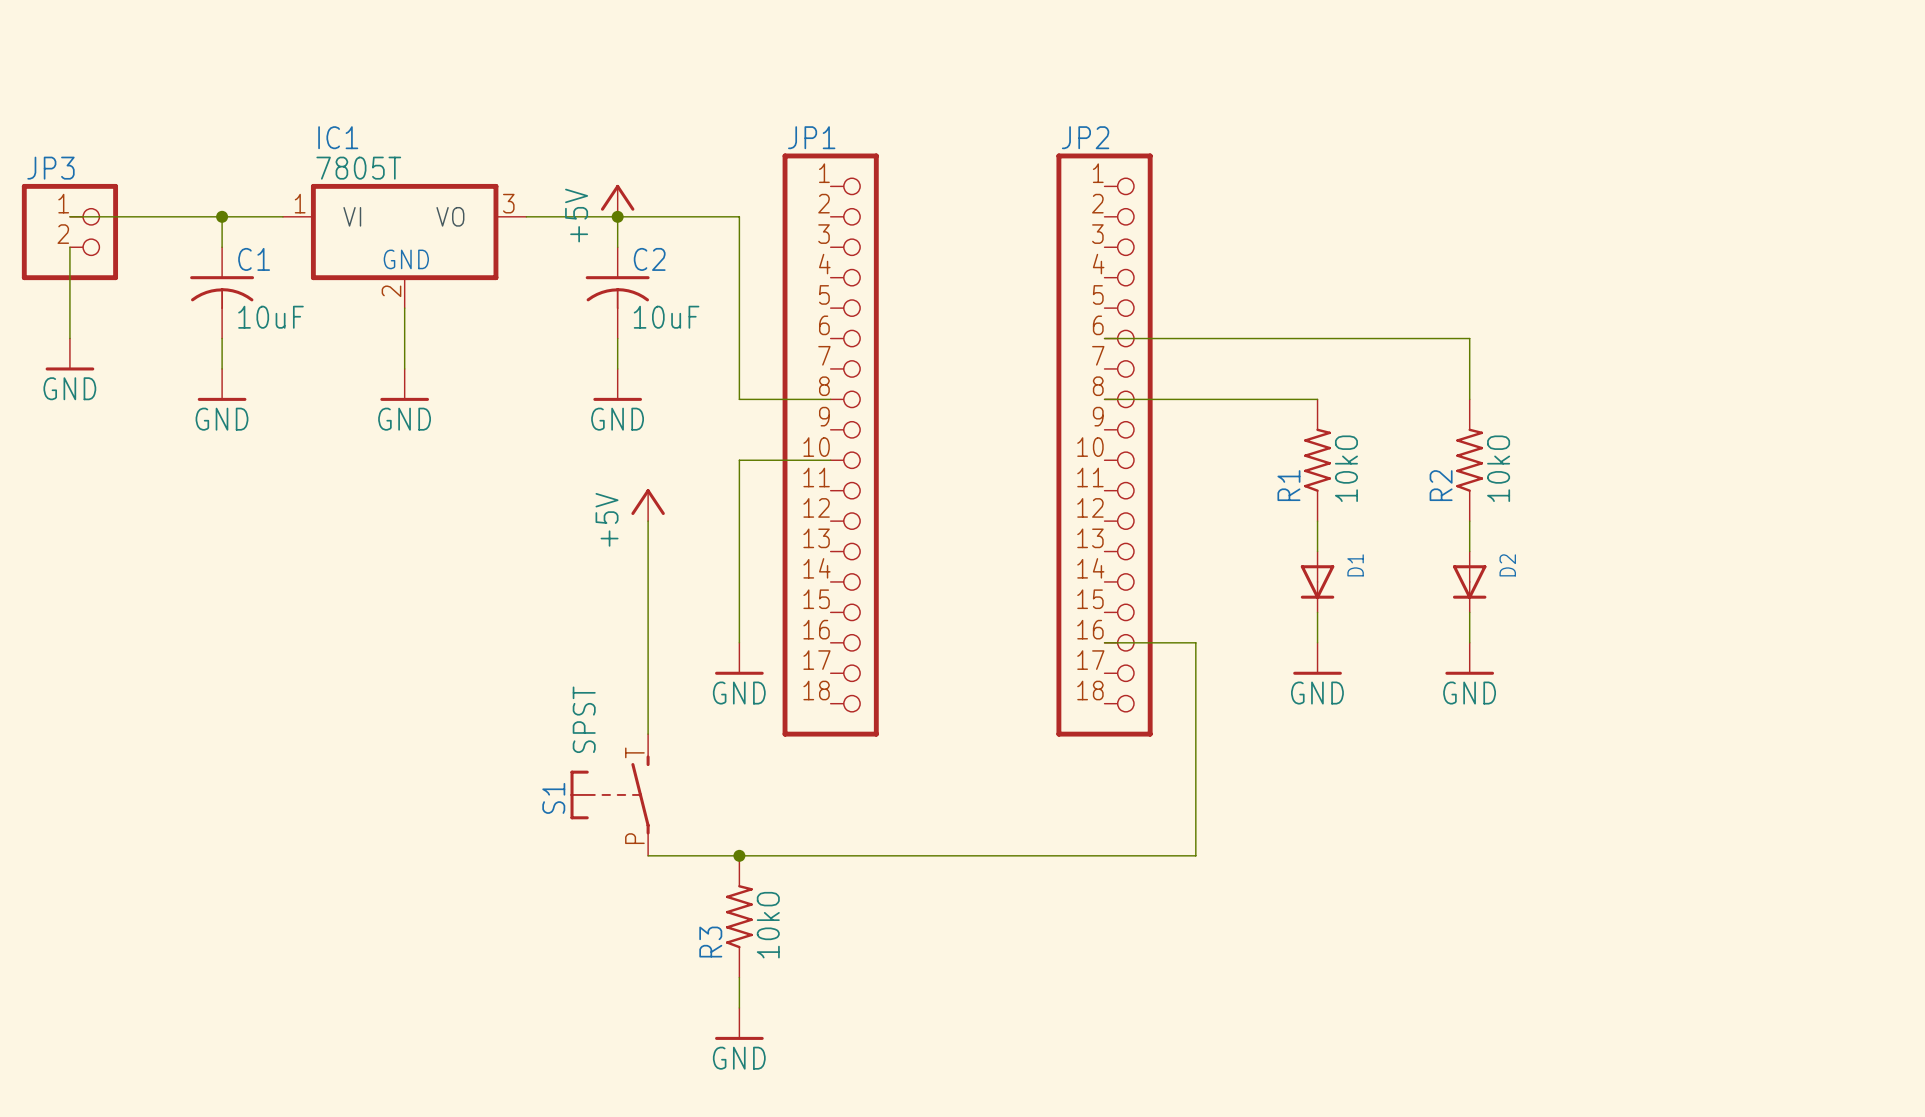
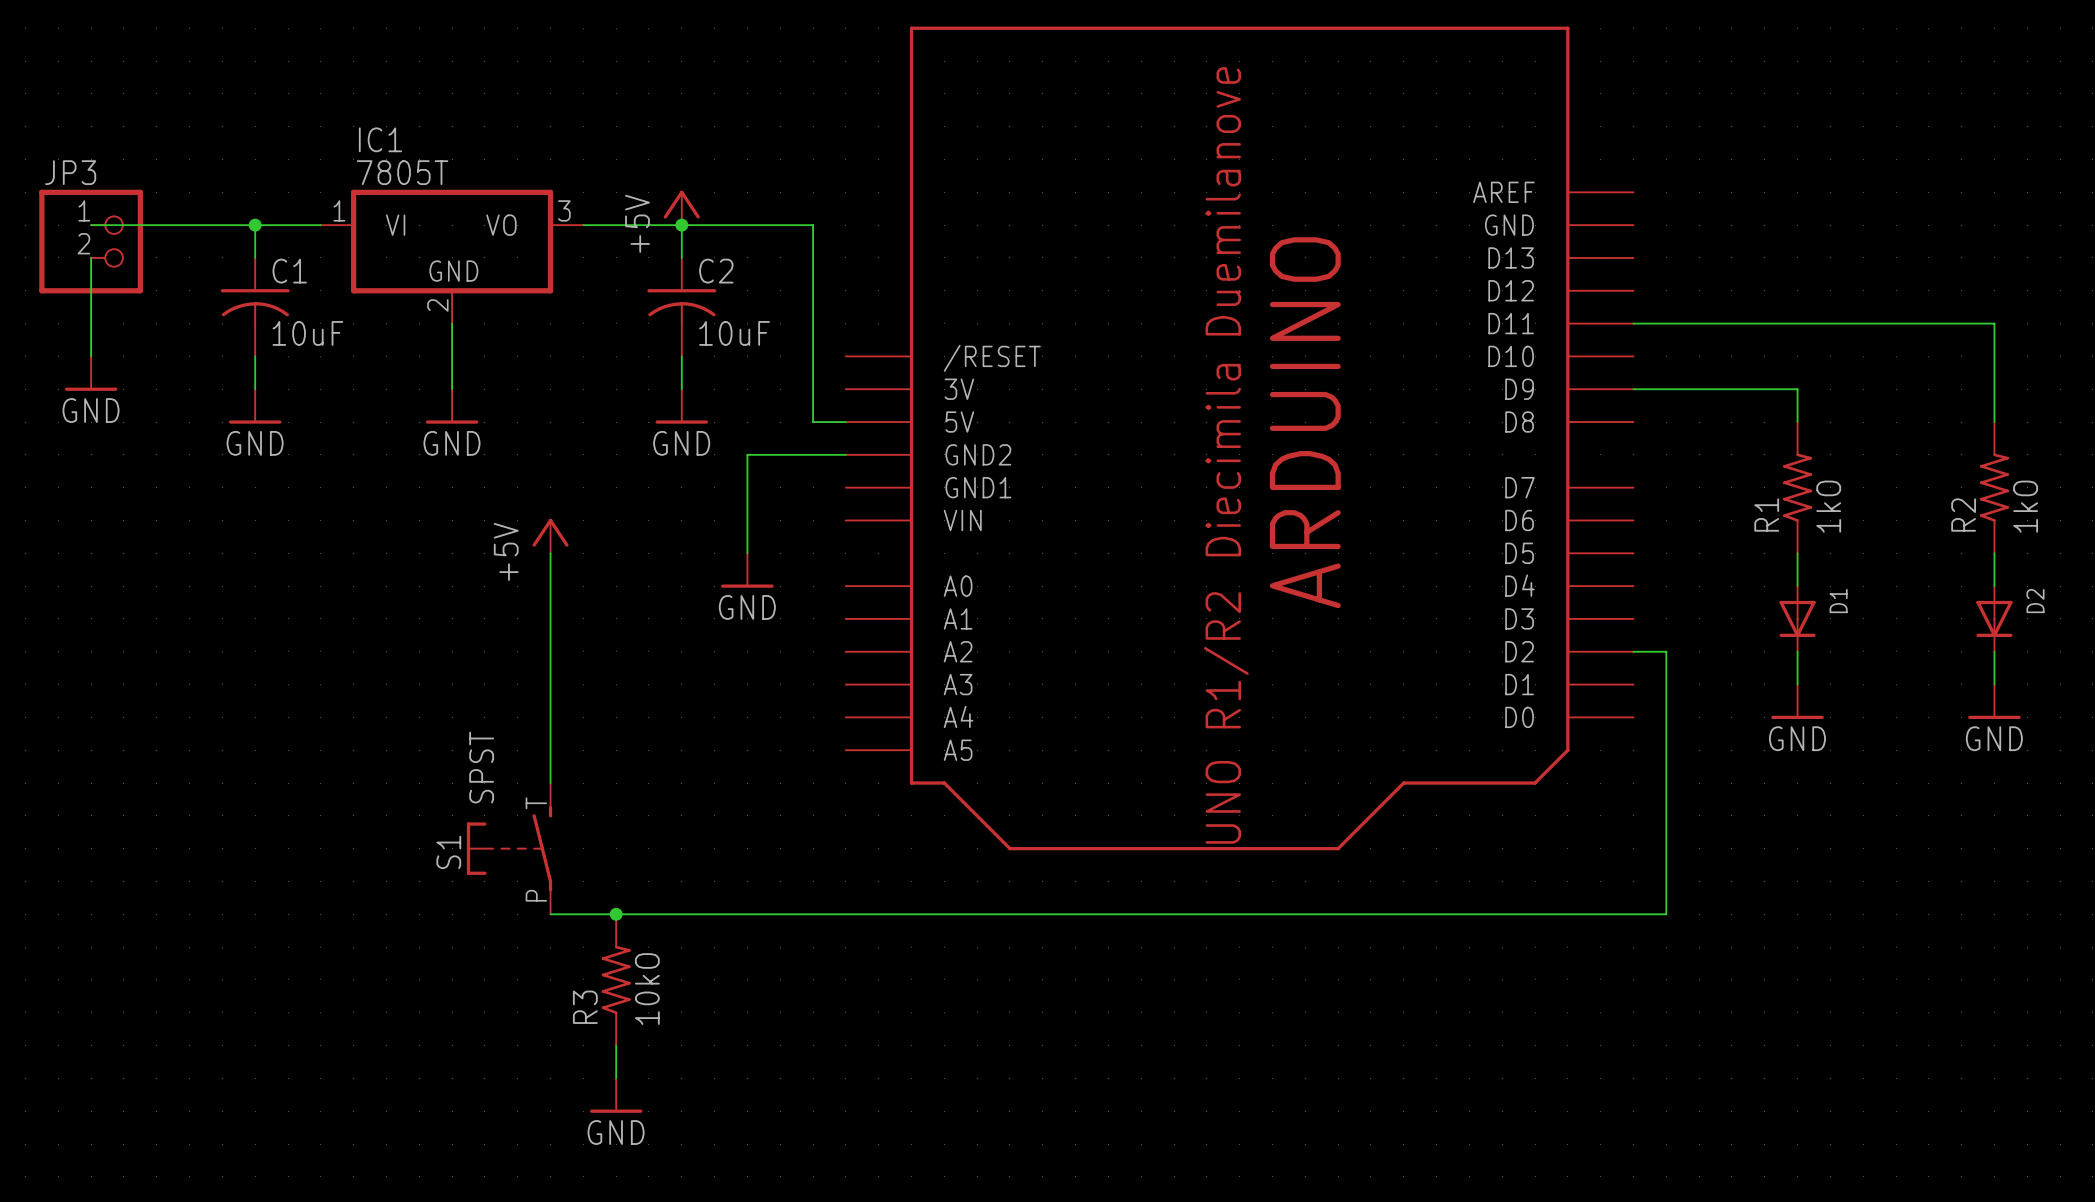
wire: none -> (1633, 323) (1994, 323) (1994, 422)
wire: (1104, 338) (1469, 338) (1469, 399) -> none
wire: none -> (1633, 389) (1797, 389) (1797, 422)
wire: (1104, 399) (1317, 399) -> none
part: none -> (1239, 438)
wire: none -> (845, 454) (747, 454) (747, 553)
JP1: (830, 445) -> none
JP2: (1104, 445) -> none
wire: (830, 460) (739, 460) (739, 642) -> none
R1 position: (1317, 460) -> (1797, 487)
R2 position: (1469, 460) -> (1994, 487)
R1 value: 10kO (1346, 468) -> 1kO (1828, 506)
R2 value: 10kO (1498, 468) -> 1kO (2025, 506)
power symbol position: +5V (648, 505) -> +5V (550, 536)
wire: (648, 521) (648, 734) -> (550, 553) (550, 783)
wire: (1317, 521) (1317, 551) -> none
wire: (1469, 521) (1469, 551) -> (1797, 553) (1797, 586)
wire: none -> (1994, 553) (1994, 586)
D1 position: (1317, 581) -> (1797, 618)
D2 position: (1469, 581) -> (1994, 618)
wire: (1317, 612) (1317, 642) -> none
wire: (1469, 612) (1469, 642) -> (1797, 651) (1797, 684)
wire: none -> (1994, 651) (1994, 684)
wire: (1104, 642) (1195, 642) (1195, 855) -> (1633, 651) (1666, 651) (1666, 914) (1305, 914)
power symbol position: GND (739, 658) -> GND (747, 570)
power symbol: GND (1317, 658) -> none
power symbol: GND (1469, 658) -> none
power symbol: none -> GND (1797, 701)
power symbol: none -> GND (1994, 701)
S1 position: (610, 794) -> (509, 848)
wire: none -> (550, 914) (714, 914)
junction: none -> (616, 914)
junction: (739, 855) -> none
R3 position: (739, 916) -> (616, 979)
wire: (739, 977) (739, 1007) -> (616, 1045) (616, 1078)
power symbol position: GND (739, 1023) -> GND (616, 1095)

